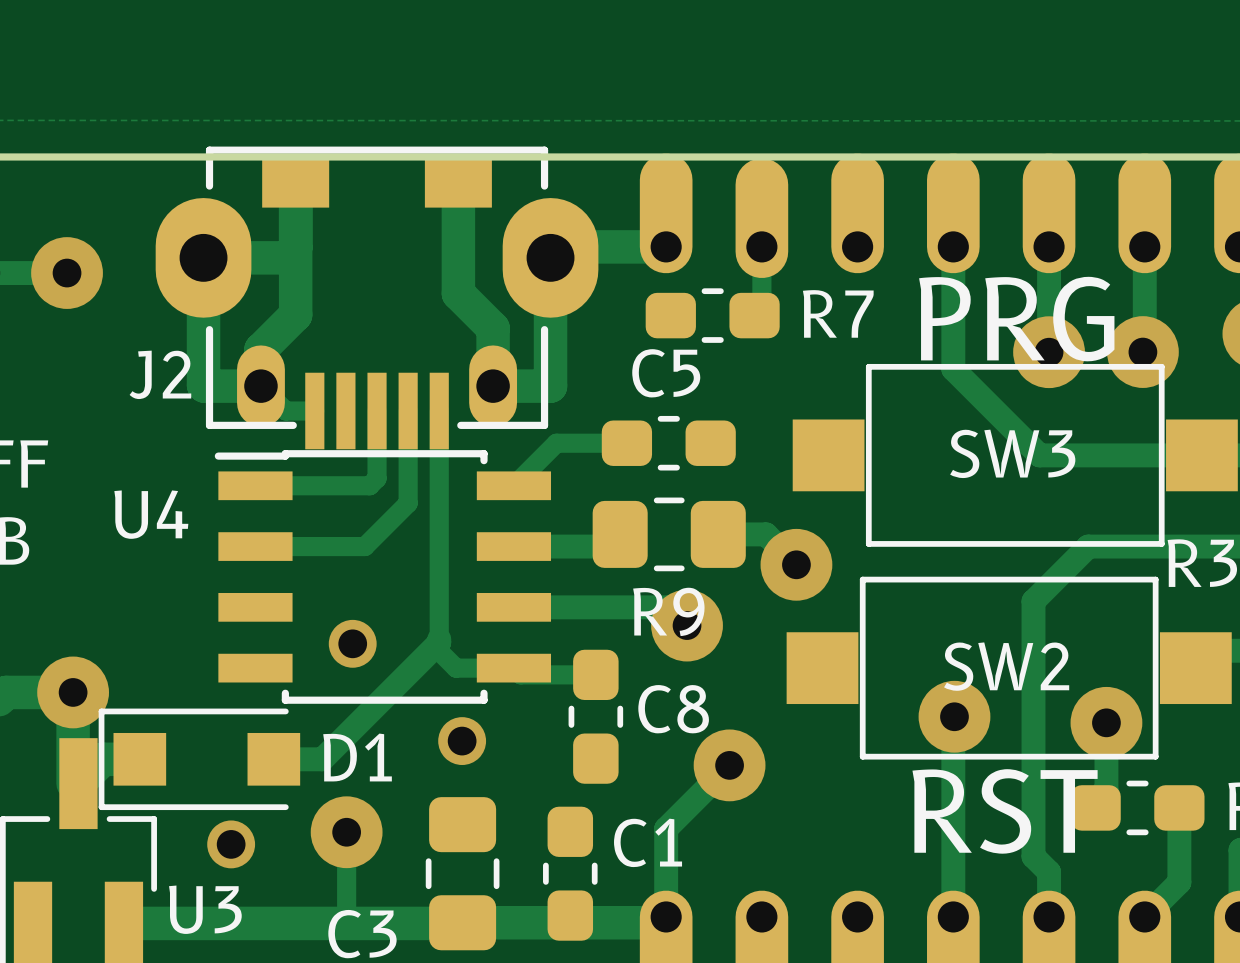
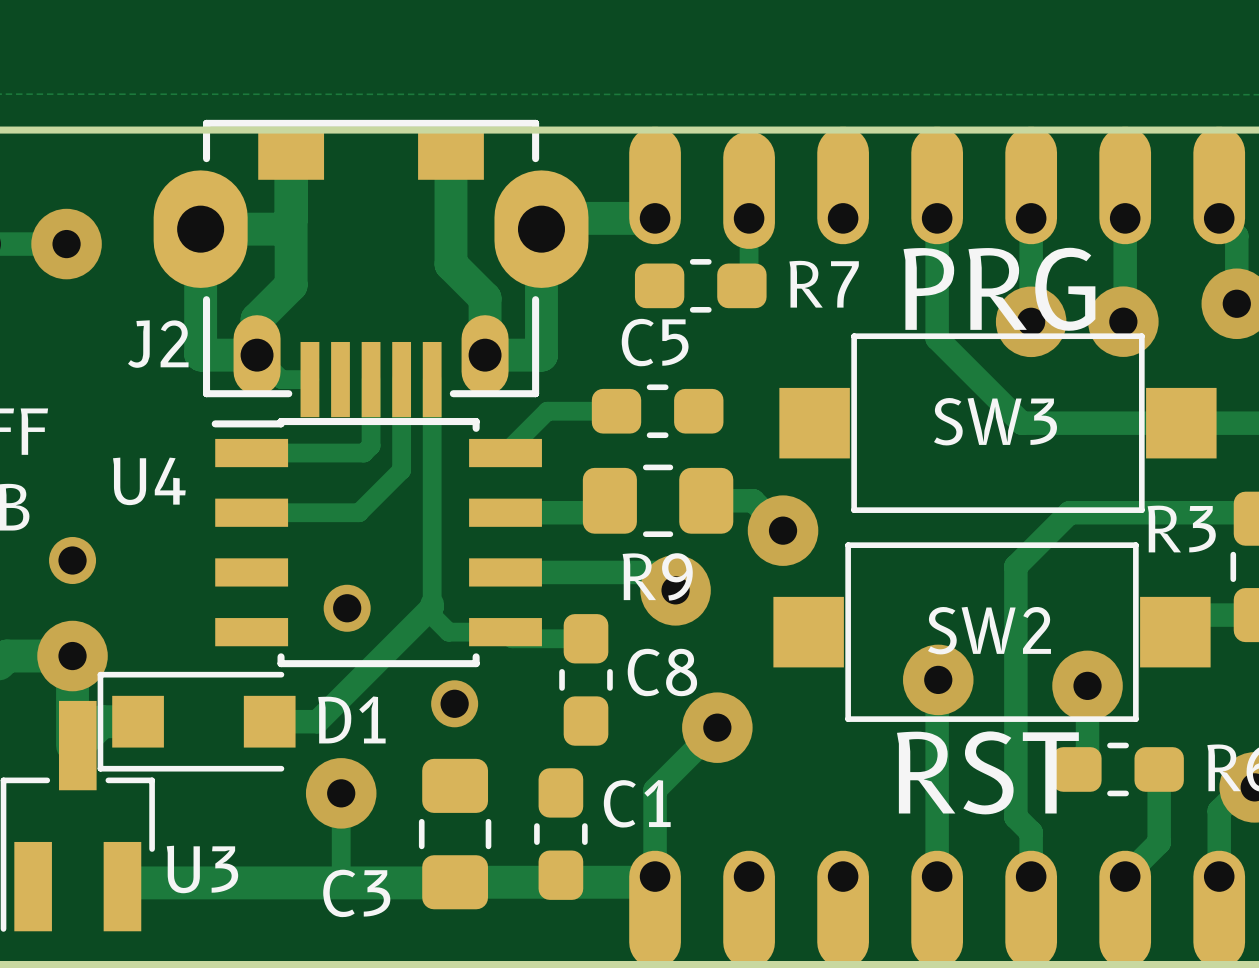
via: none -> (72, 560)
via: (231, 844) -> none

